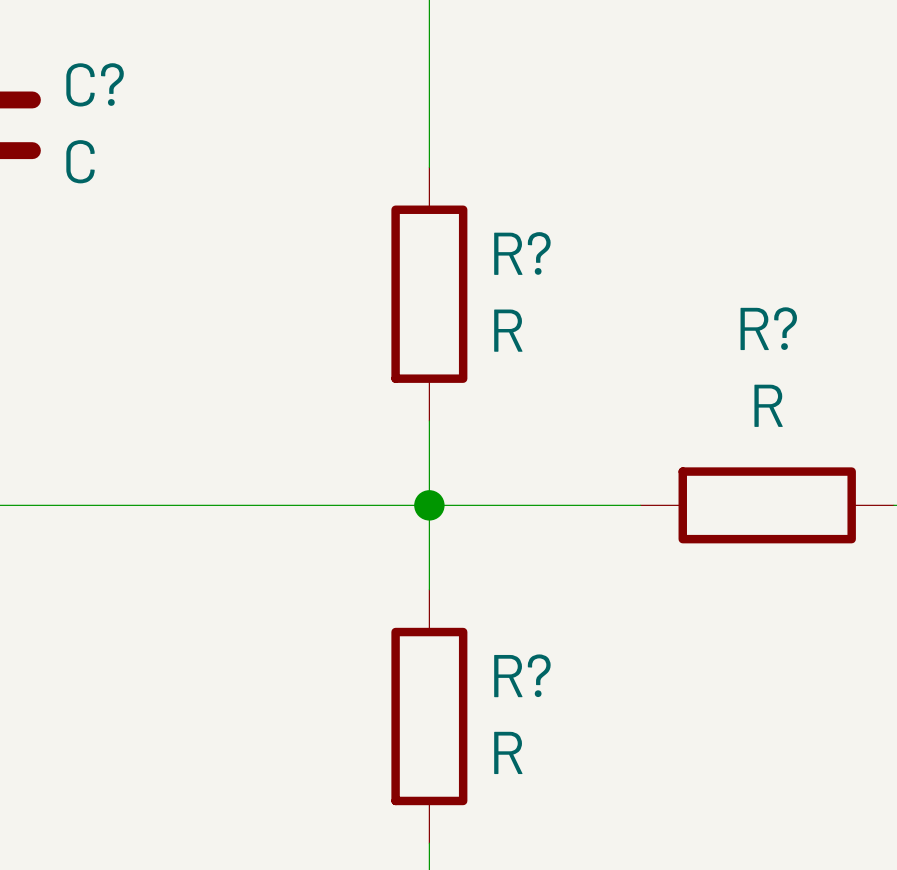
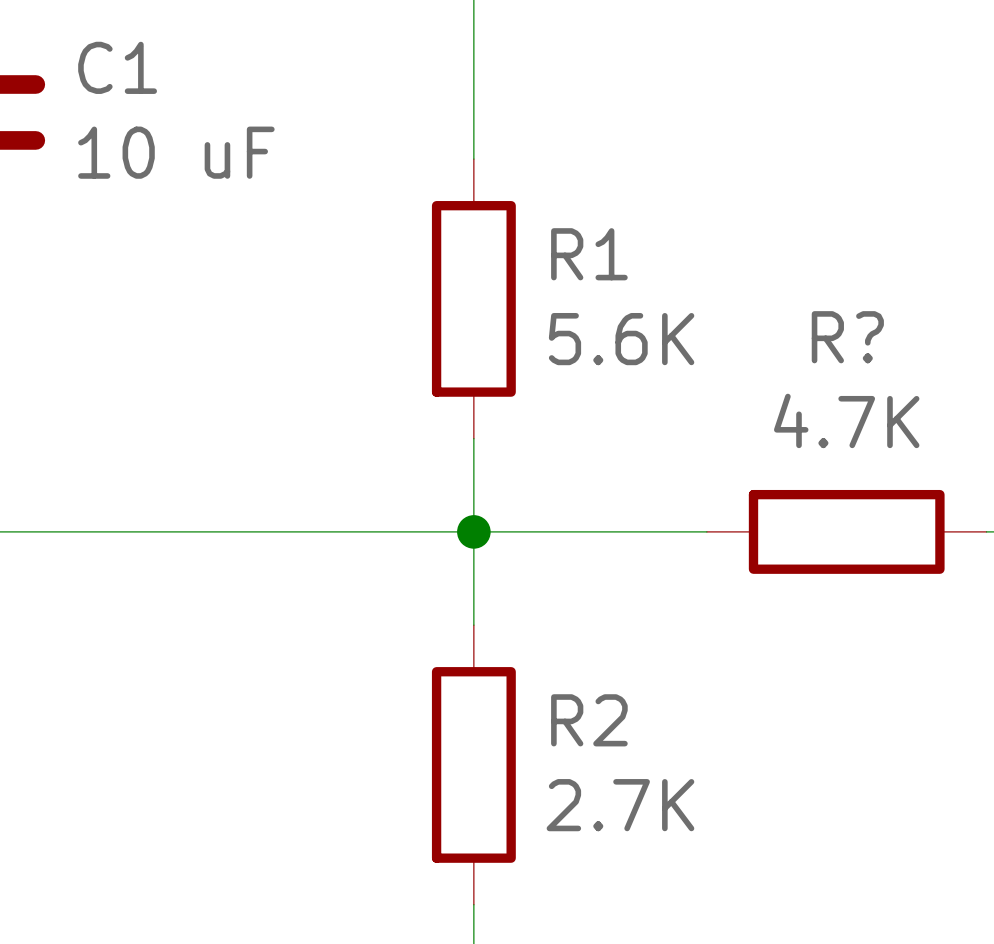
C? name: C? (95, 84) -> C1 (117, 67)
C? value: C (80, 161) -> 10 uF (176, 152)
R? name: R? (522, 253) -> R1 (589, 254)
R? value: R (508, 330) -> 5.6K (621, 339)
R? value: R (768, 405) -> 4.7K (846, 420)
R? name: R? (522, 675) -> R2 (589, 720)
R? value: R (508, 752) -> 2.7K (620, 805)

